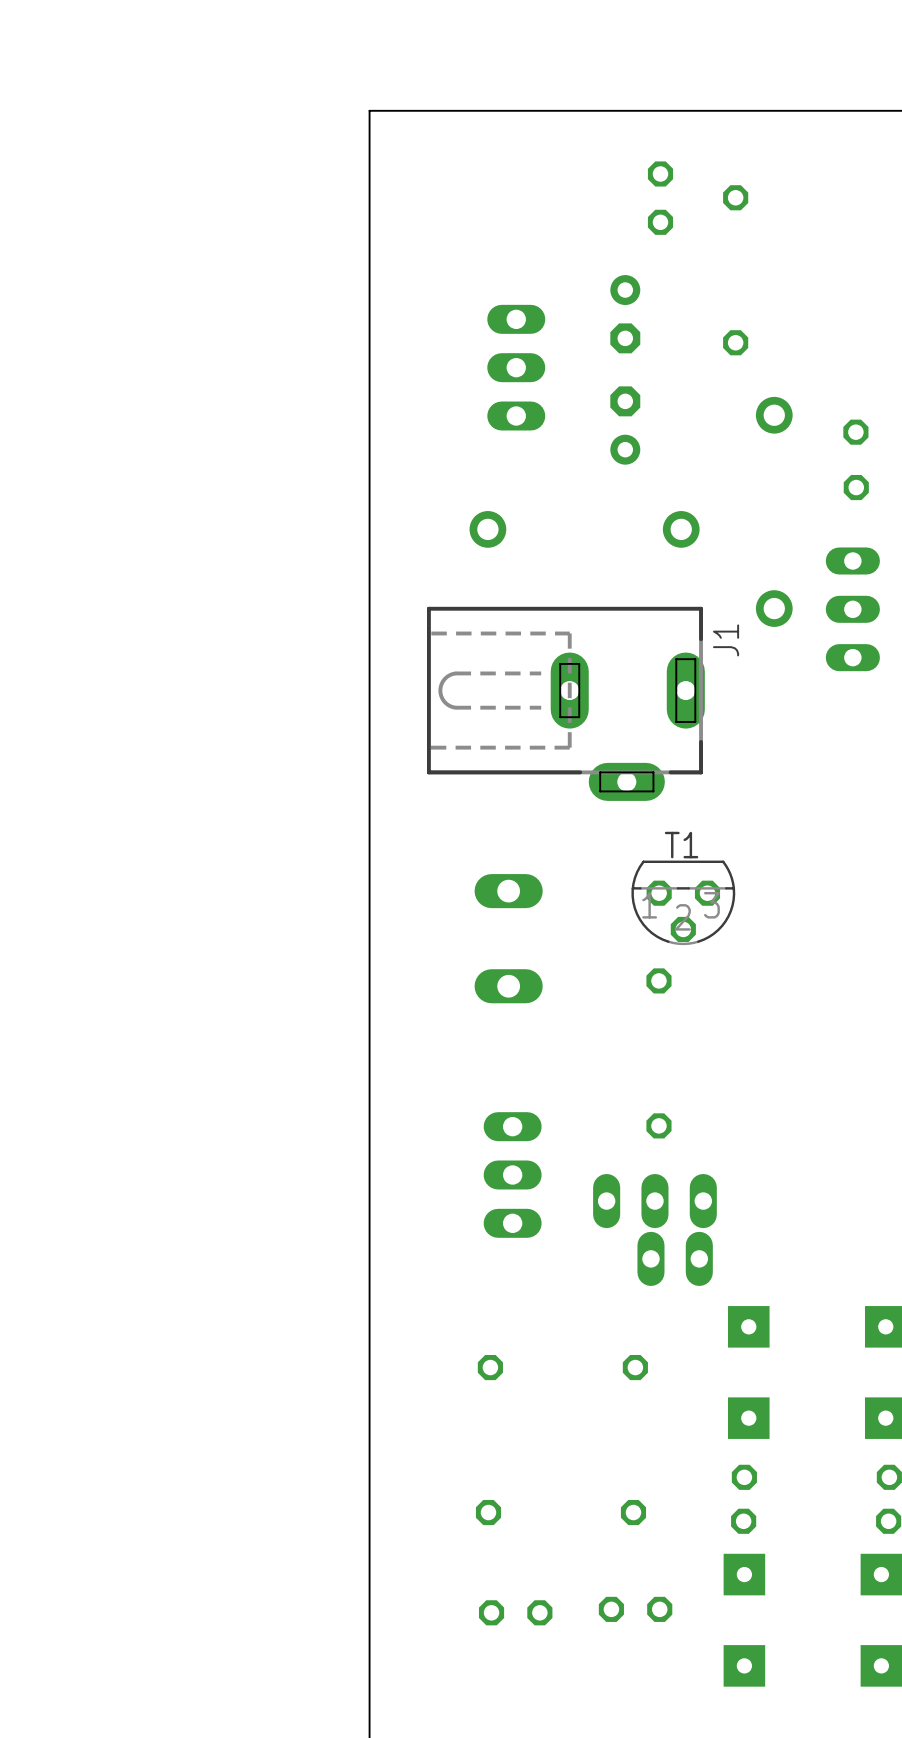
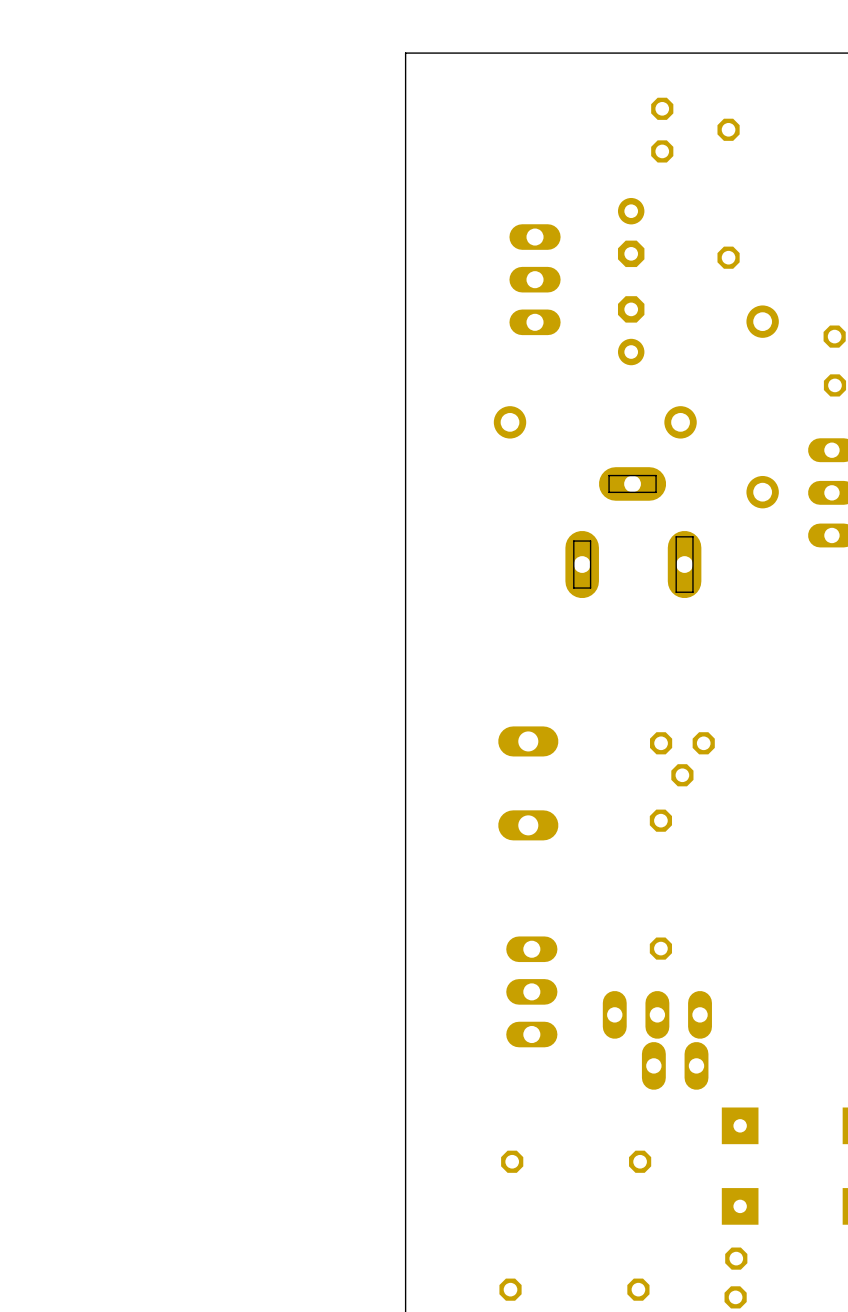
J1 side: bottom (565, 703) -> top (633, 532)
T1 side: bottom (683, 902) -> top (682, 759)

